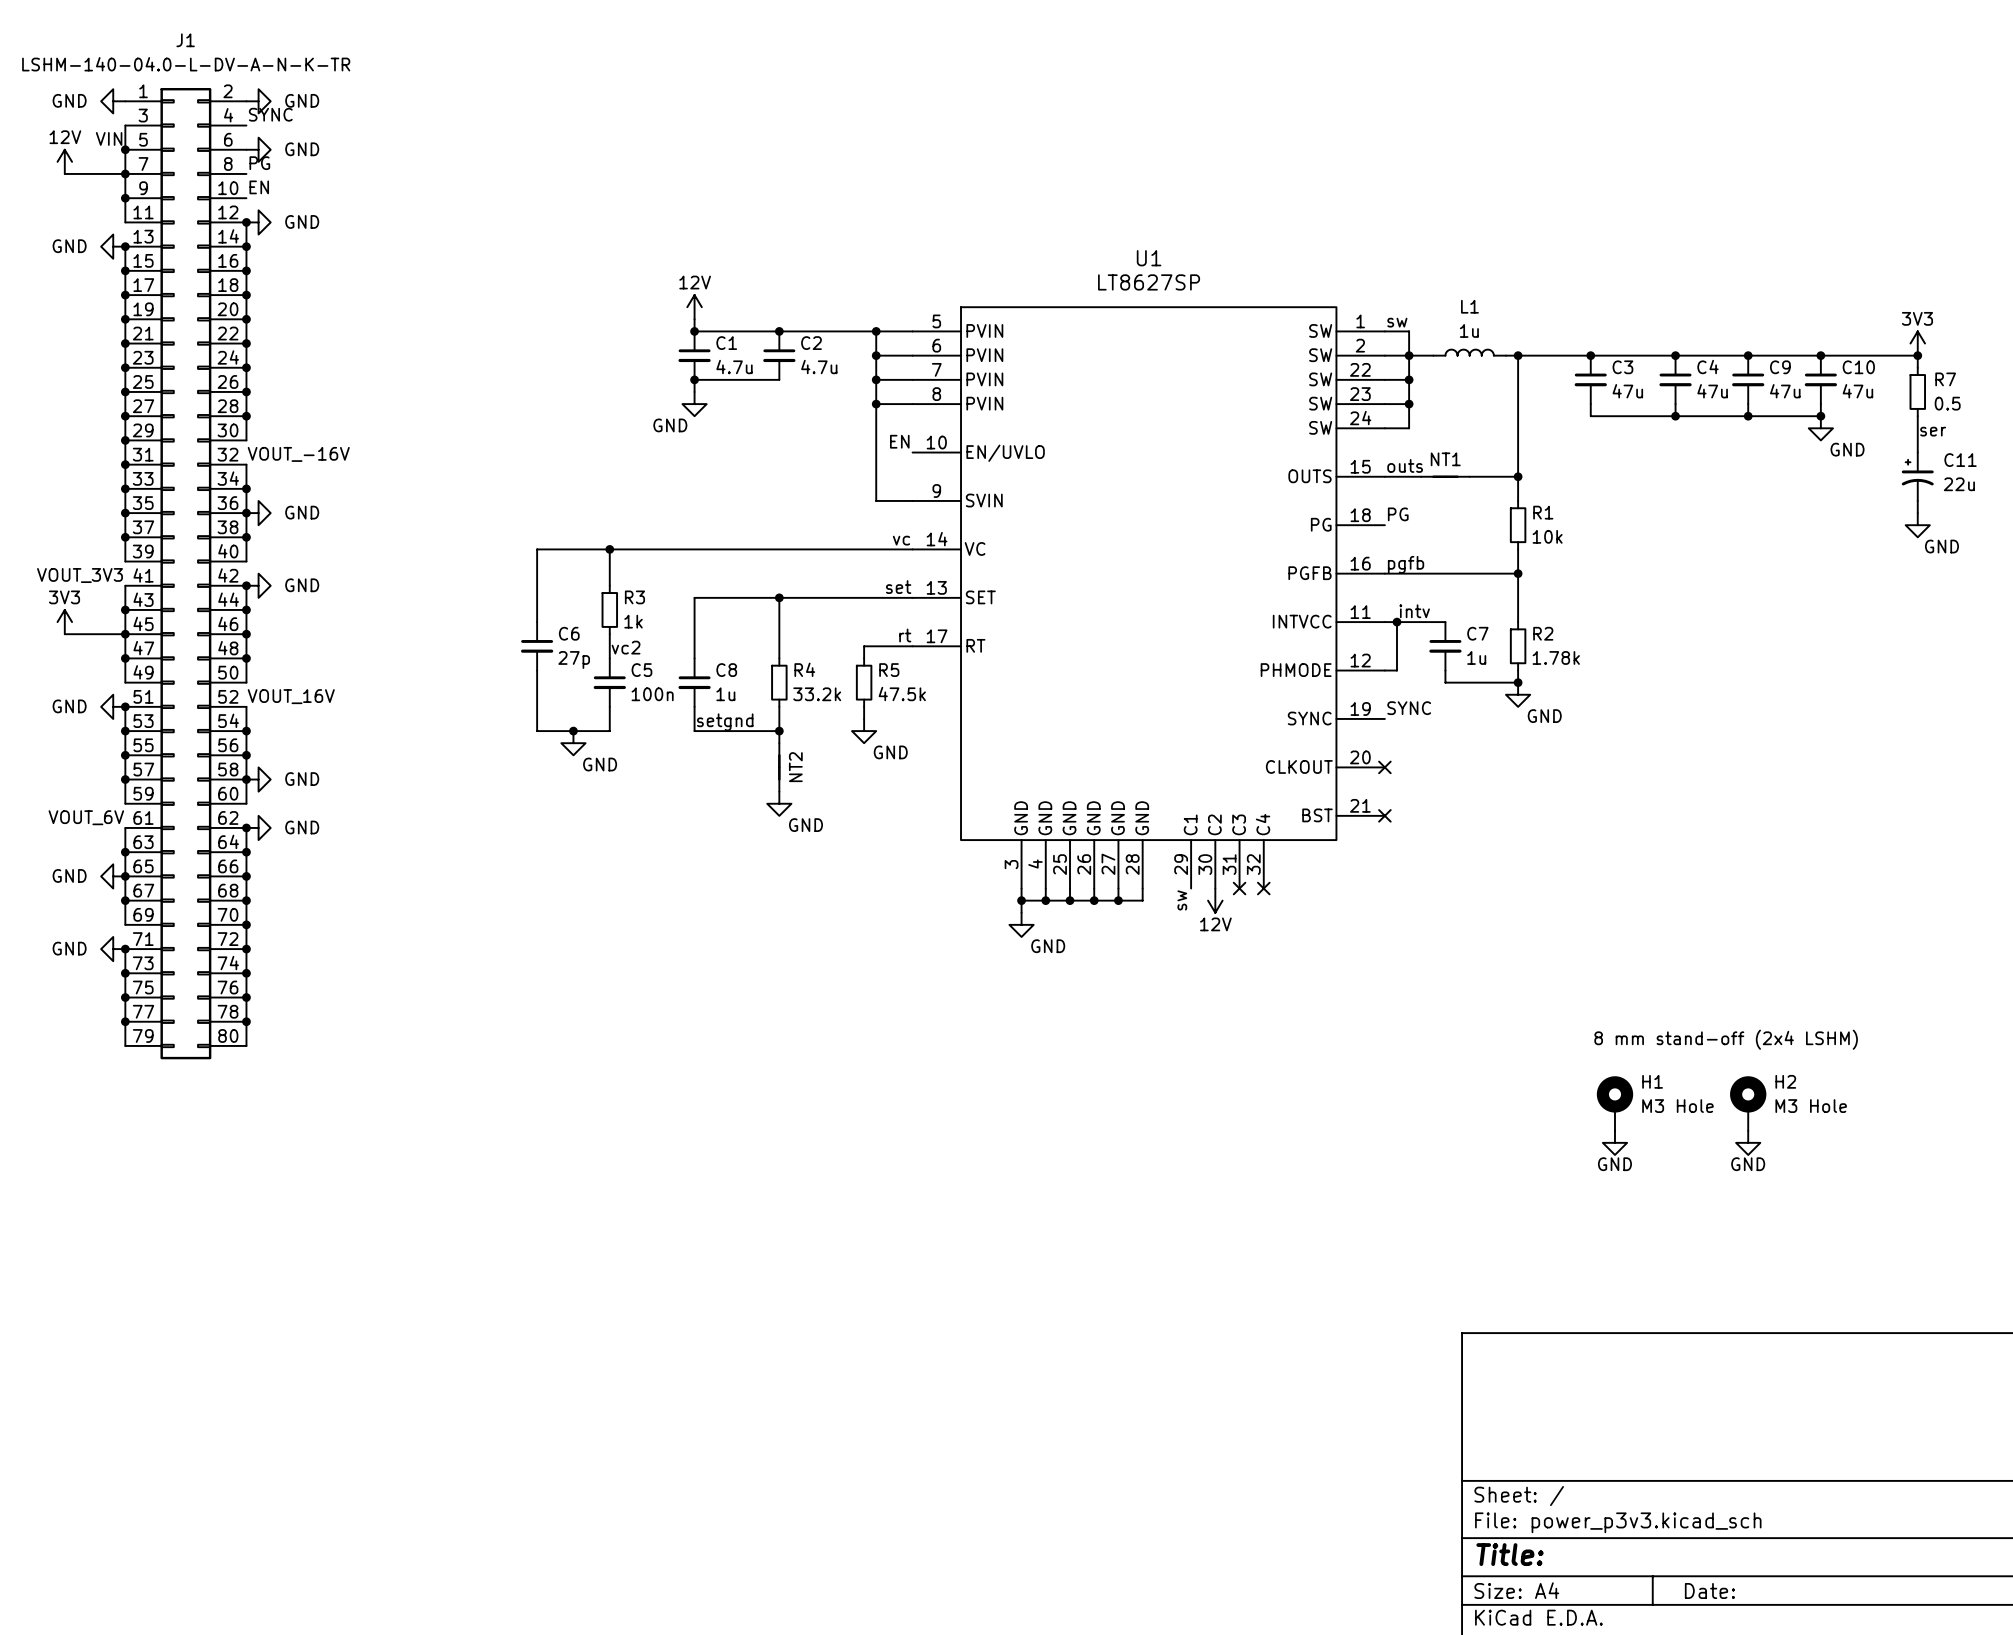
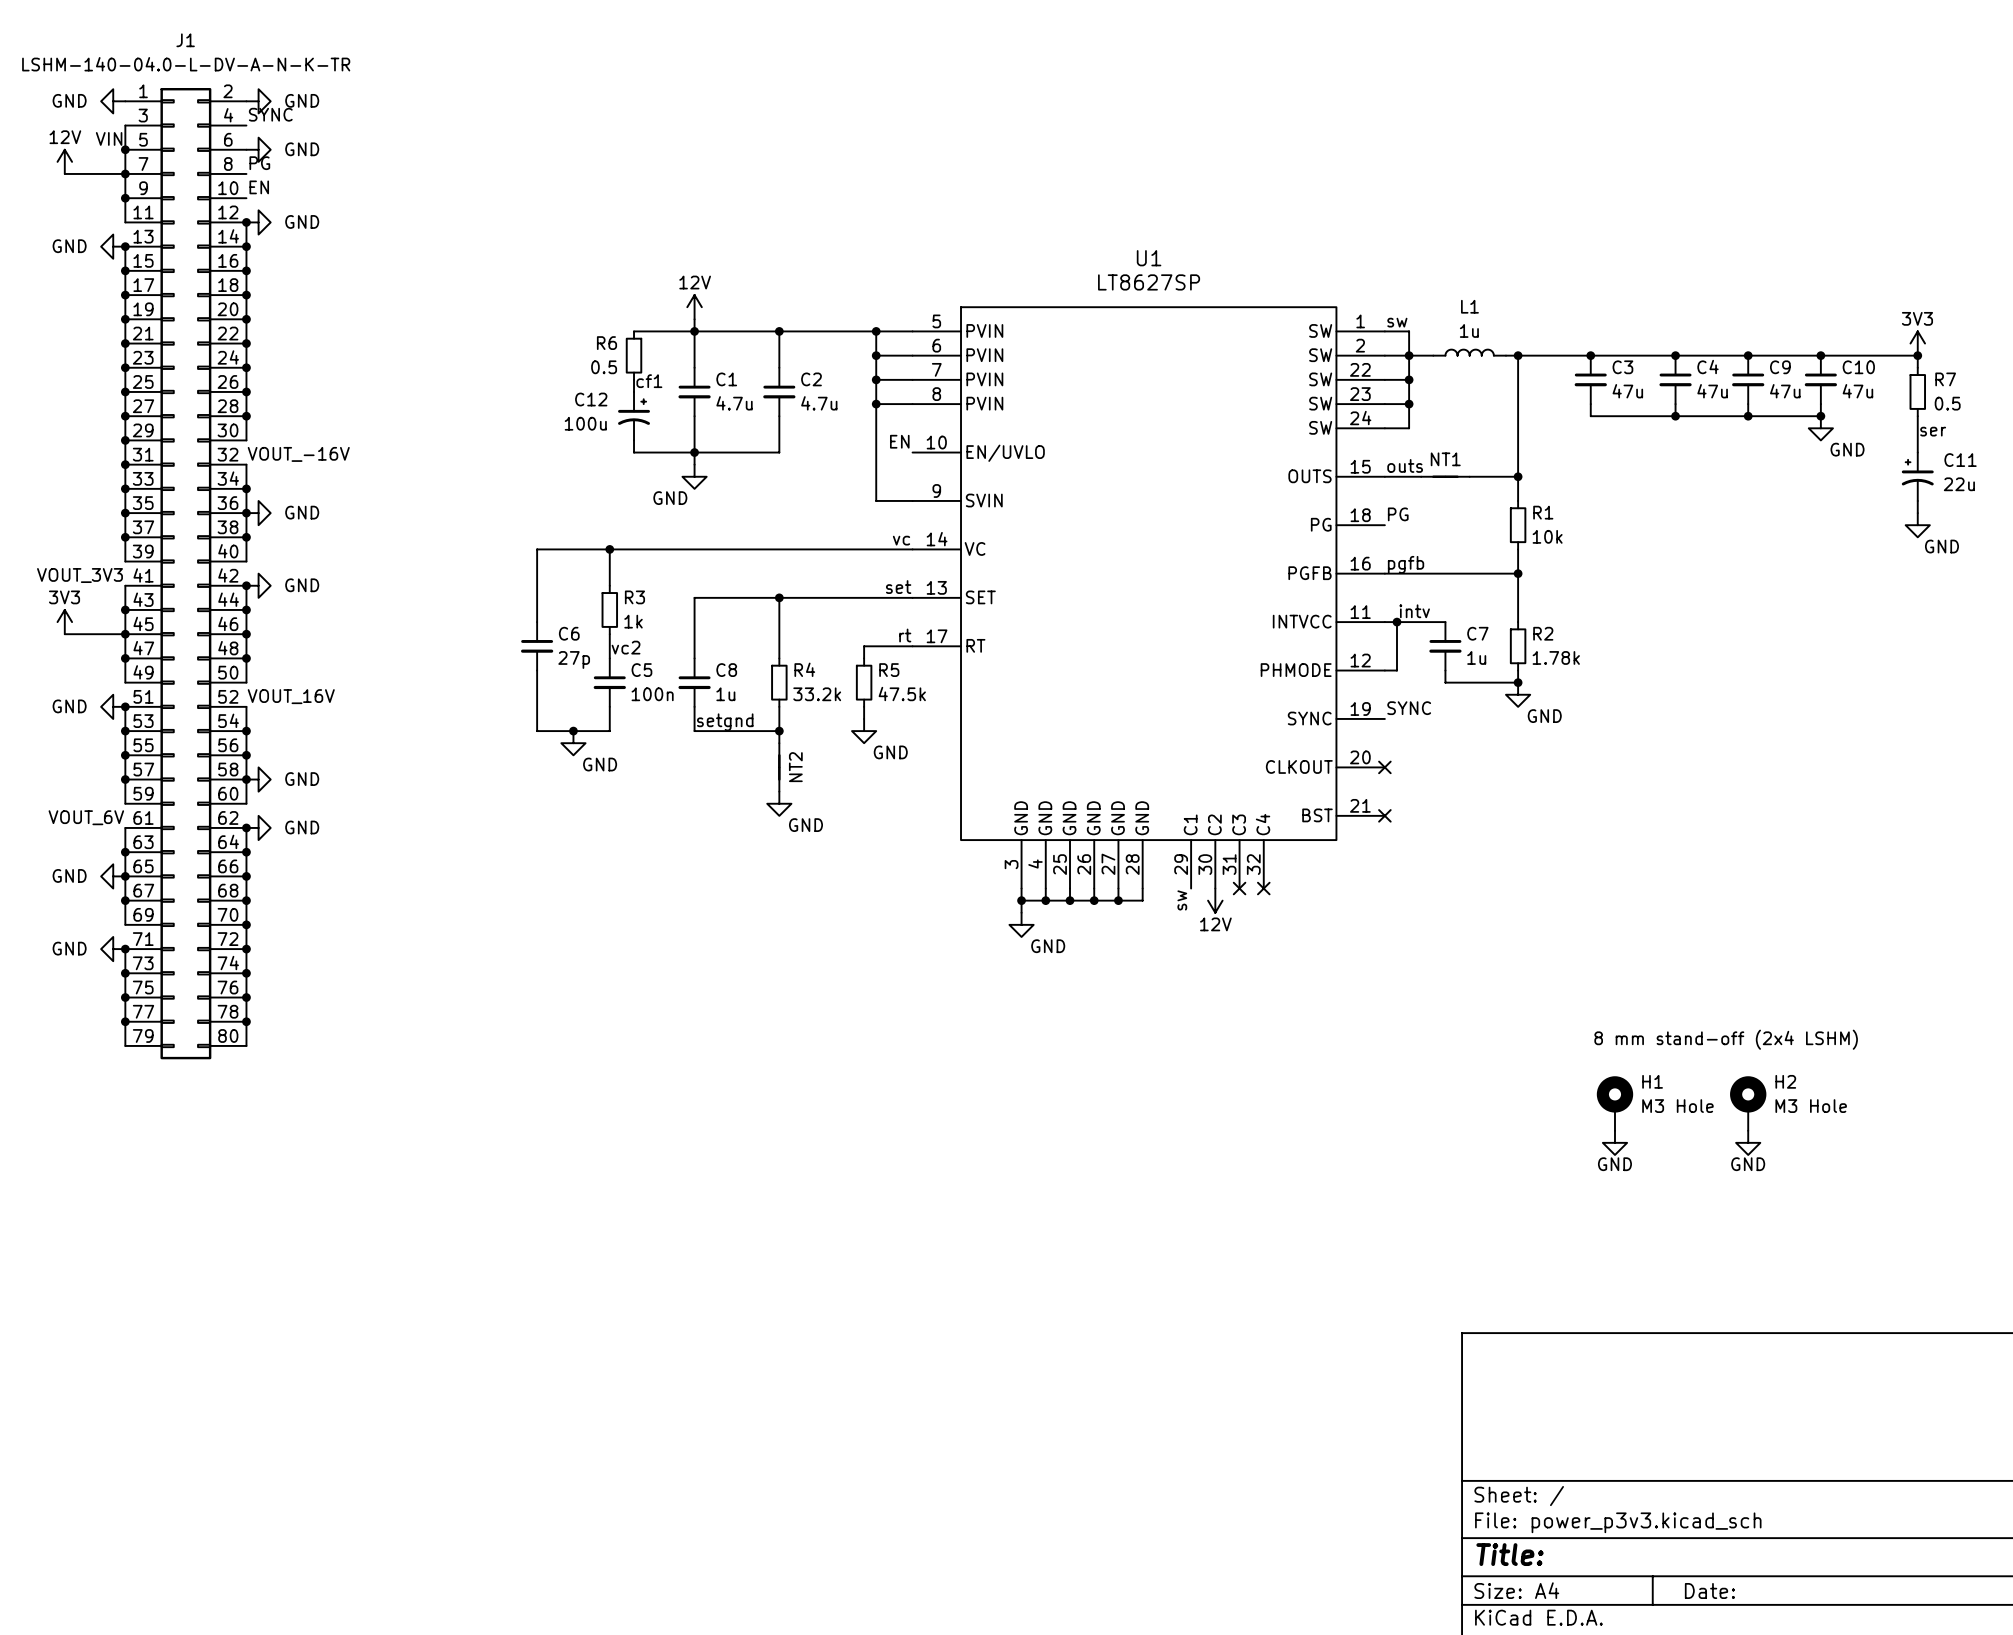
wire: none -> (634, 331) (694, 331) (694, 367)
R6: none -> 0.5 (634, 355)
C1 position: (694, 355) -> (694, 391)
C2 position: (779, 355) -> (779, 391)
wire: none -> (634, 379) (634, 391)
junction: (694, 379) -> none
wire: (779, 379) (694, 379) (694, 391) -> none
label: none -> cf1 (649, 381)
power symbol position: GND (694, 404) -> GND (694, 476)
C12: none -> 100u (634, 416)
wire: none -> (694, 416) (694, 464)
wire: none -> (779, 416) (779, 452) (634, 452) (634, 440)
junction: none -> (694, 452)

